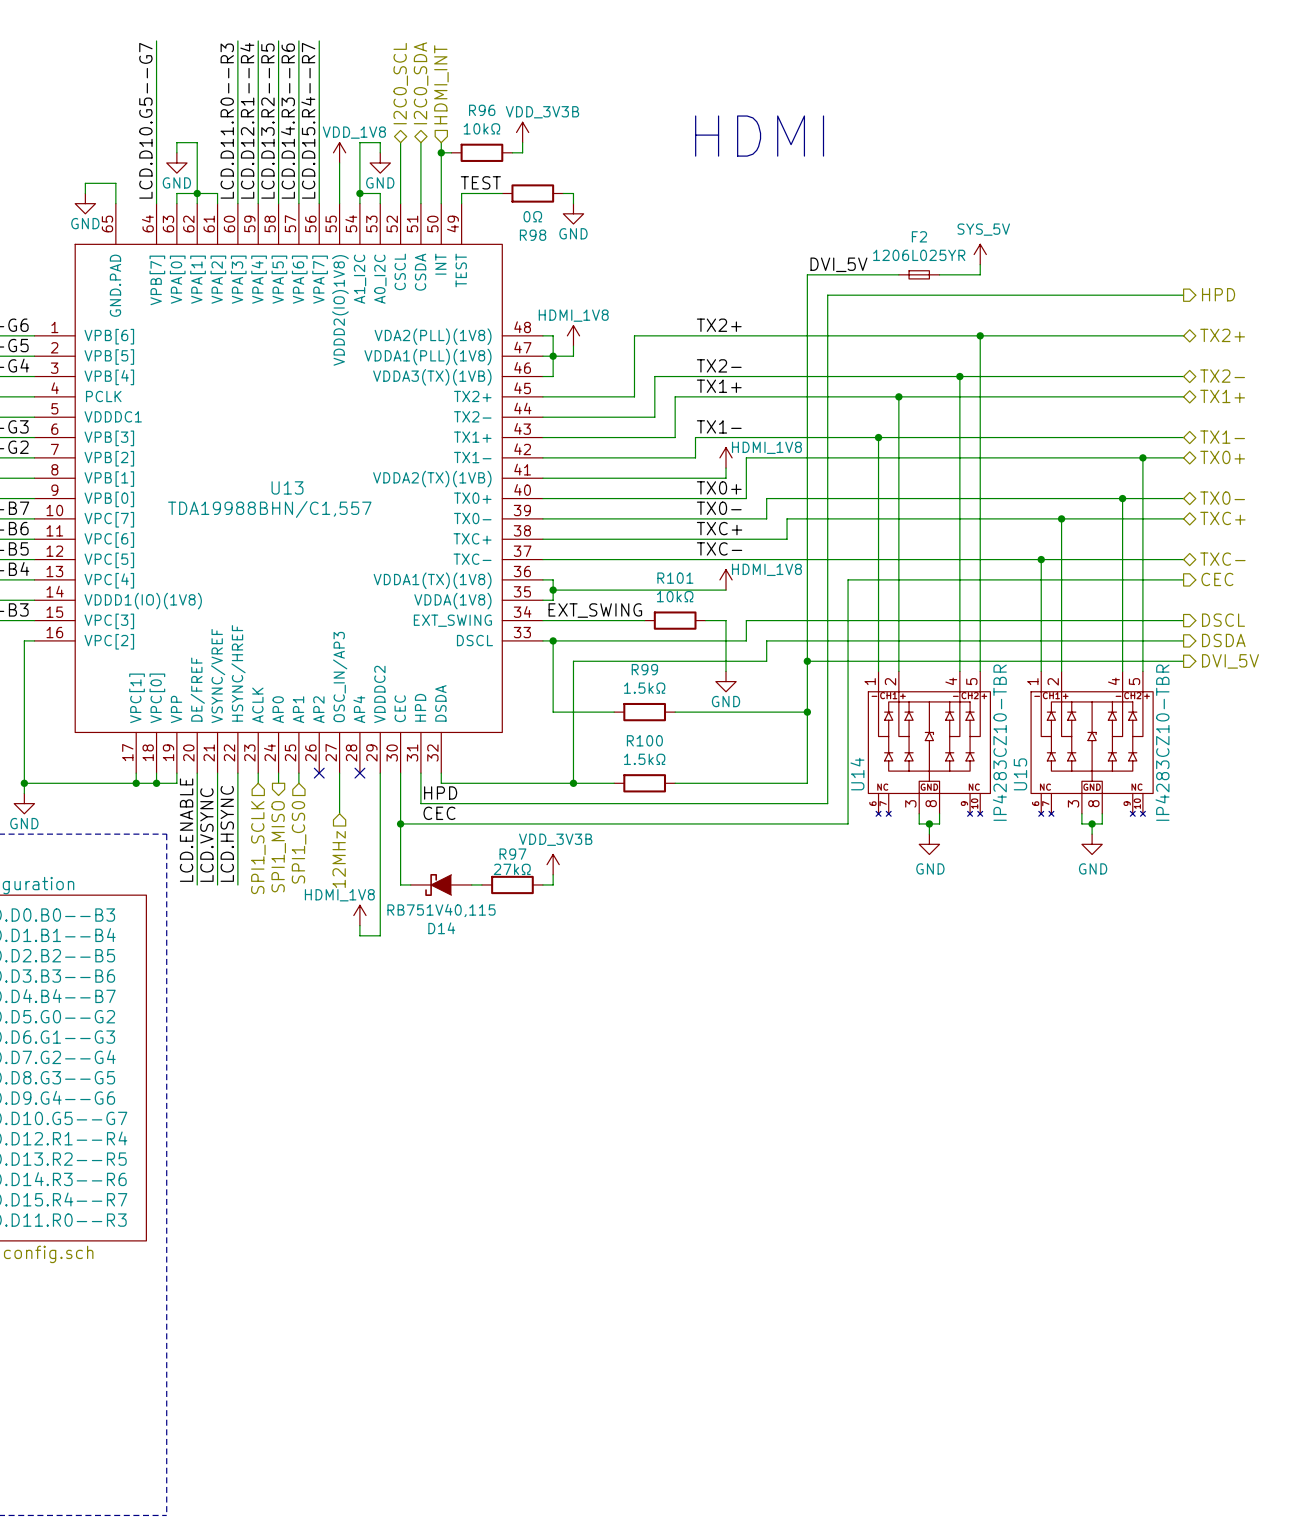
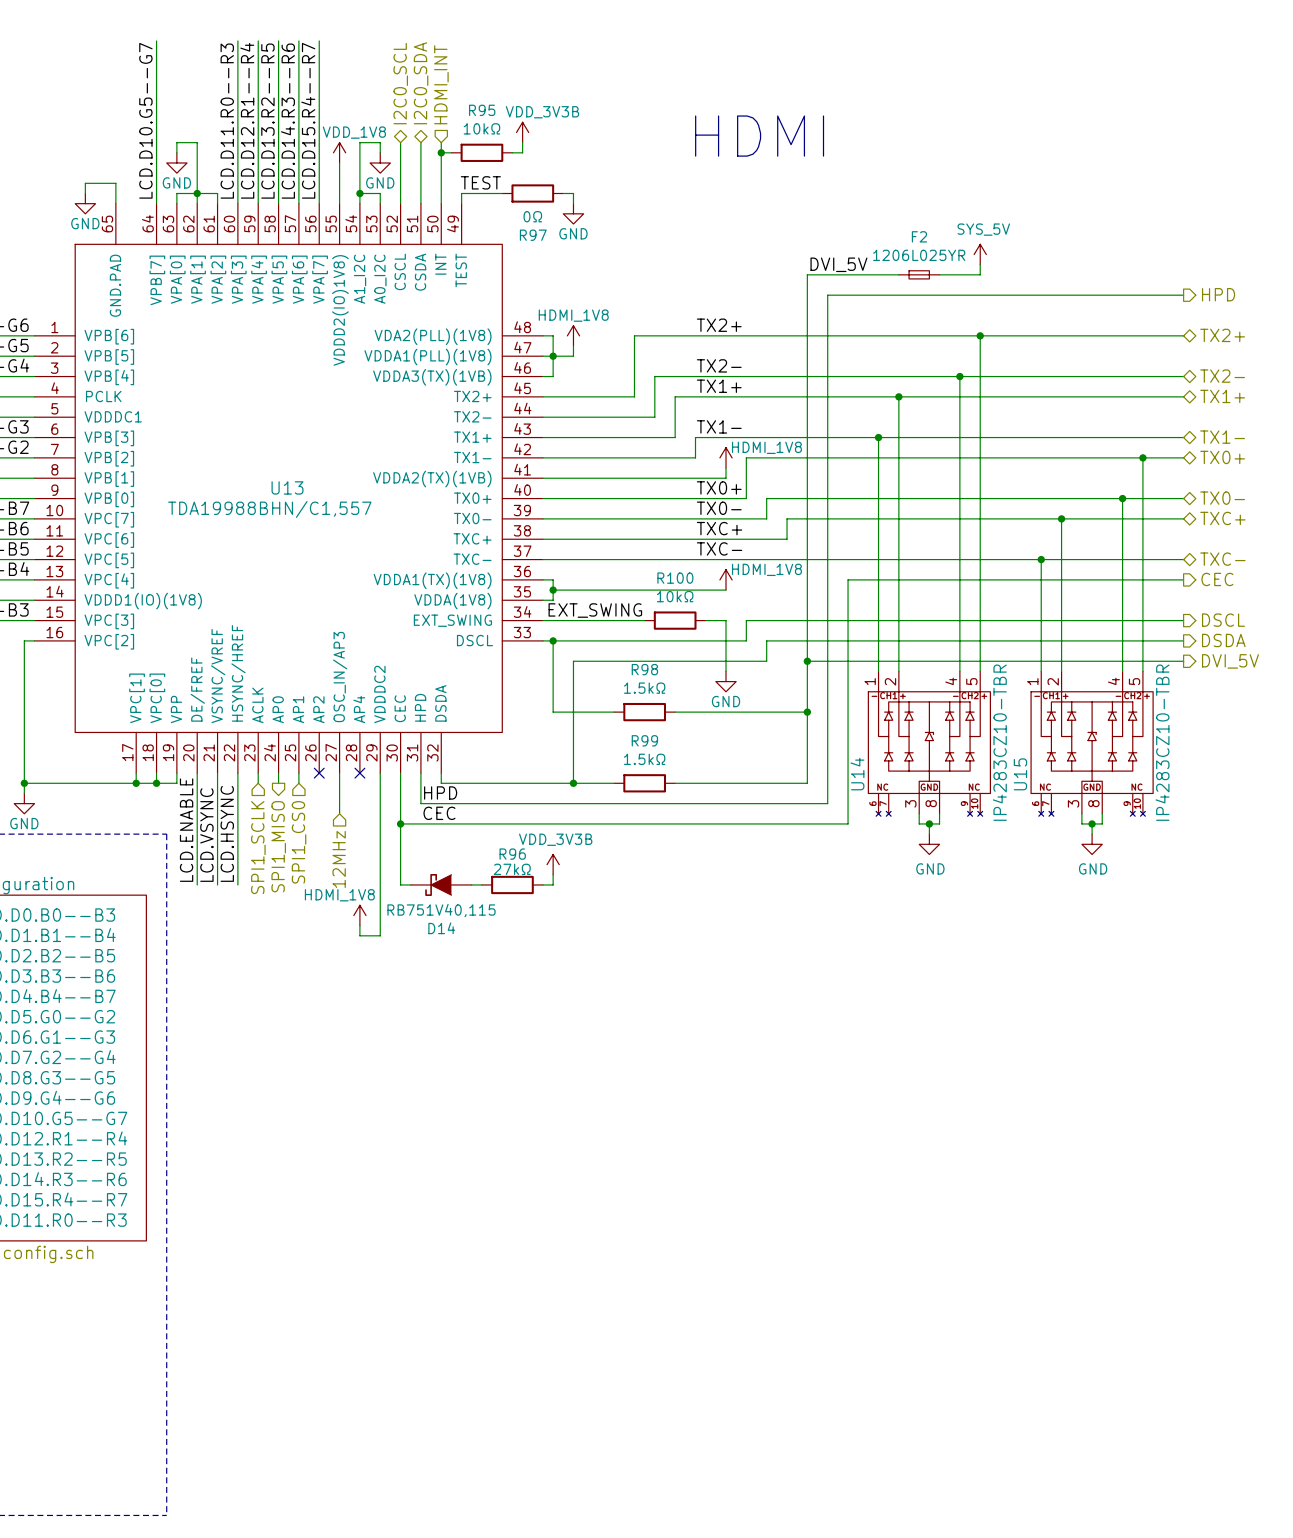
R96 name: R96 (482, 110) -> R95 (482, 110)
R98 name: R98 (533, 235) -> R97 (533, 235)
R101 name: R101 (675, 578) -> R100 (675, 578)
R99 name: R99 (644, 669) -> R98 (644, 669)
R100 name: R100 (644, 740) -> R99 (644, 740)
R97 name: R97 (512, 854) -> R96 (512, 854)

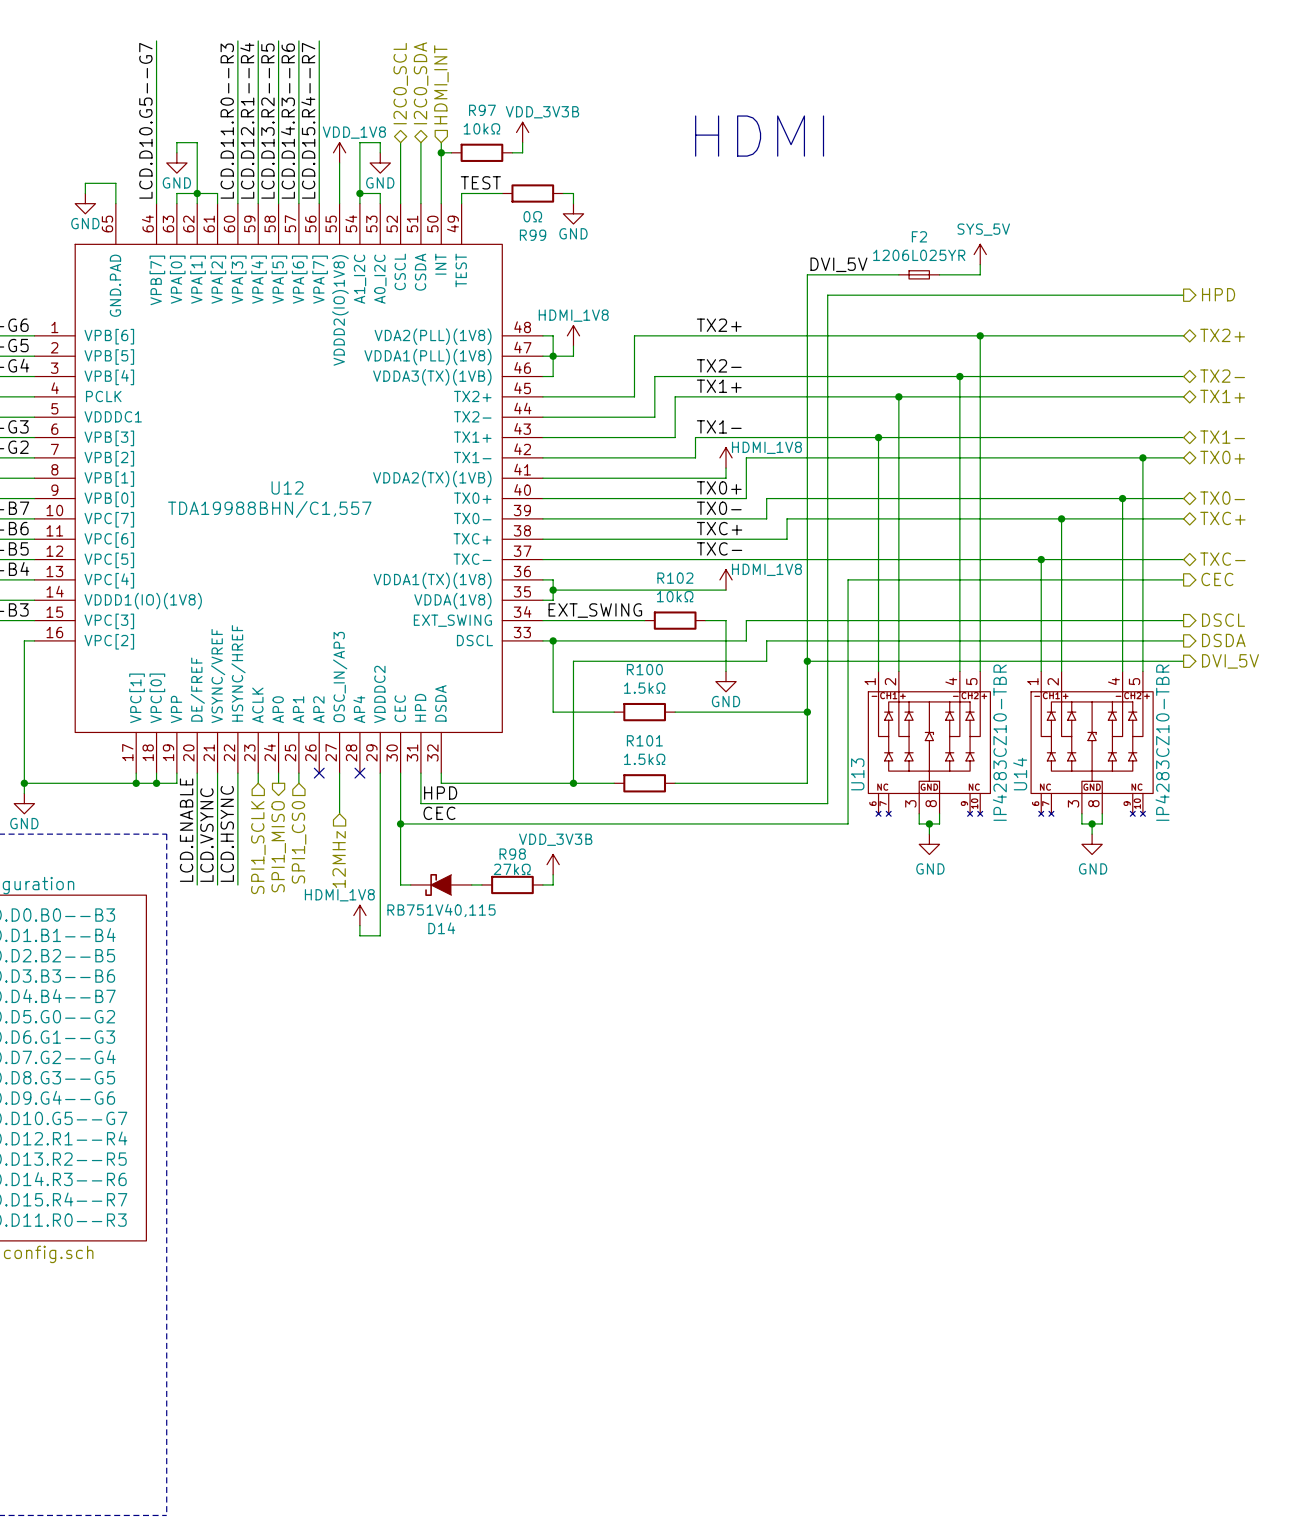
R95 name: R95 (482, 110) -> R97 (482, 110)
R97 name: R97 (533, 235) -> R99 (533, 235)
U13 name: U13 (287, 487) -> U12 (287, 487)
R100 name: R100 (675, 578) -> R102 (675, 578)
R98 name: R98 (644, 669) -> R100 (644, 669)
R99 name: R99 (644, 740) -> R101 (644, 740)
U14 name: U14 (857, 774) -> U13 (857, 774)
U15 name: U15 (1020, 774) -> U14 (1020, 774)
R96 name: R96 (512, 854) -> R98 (512, 854)

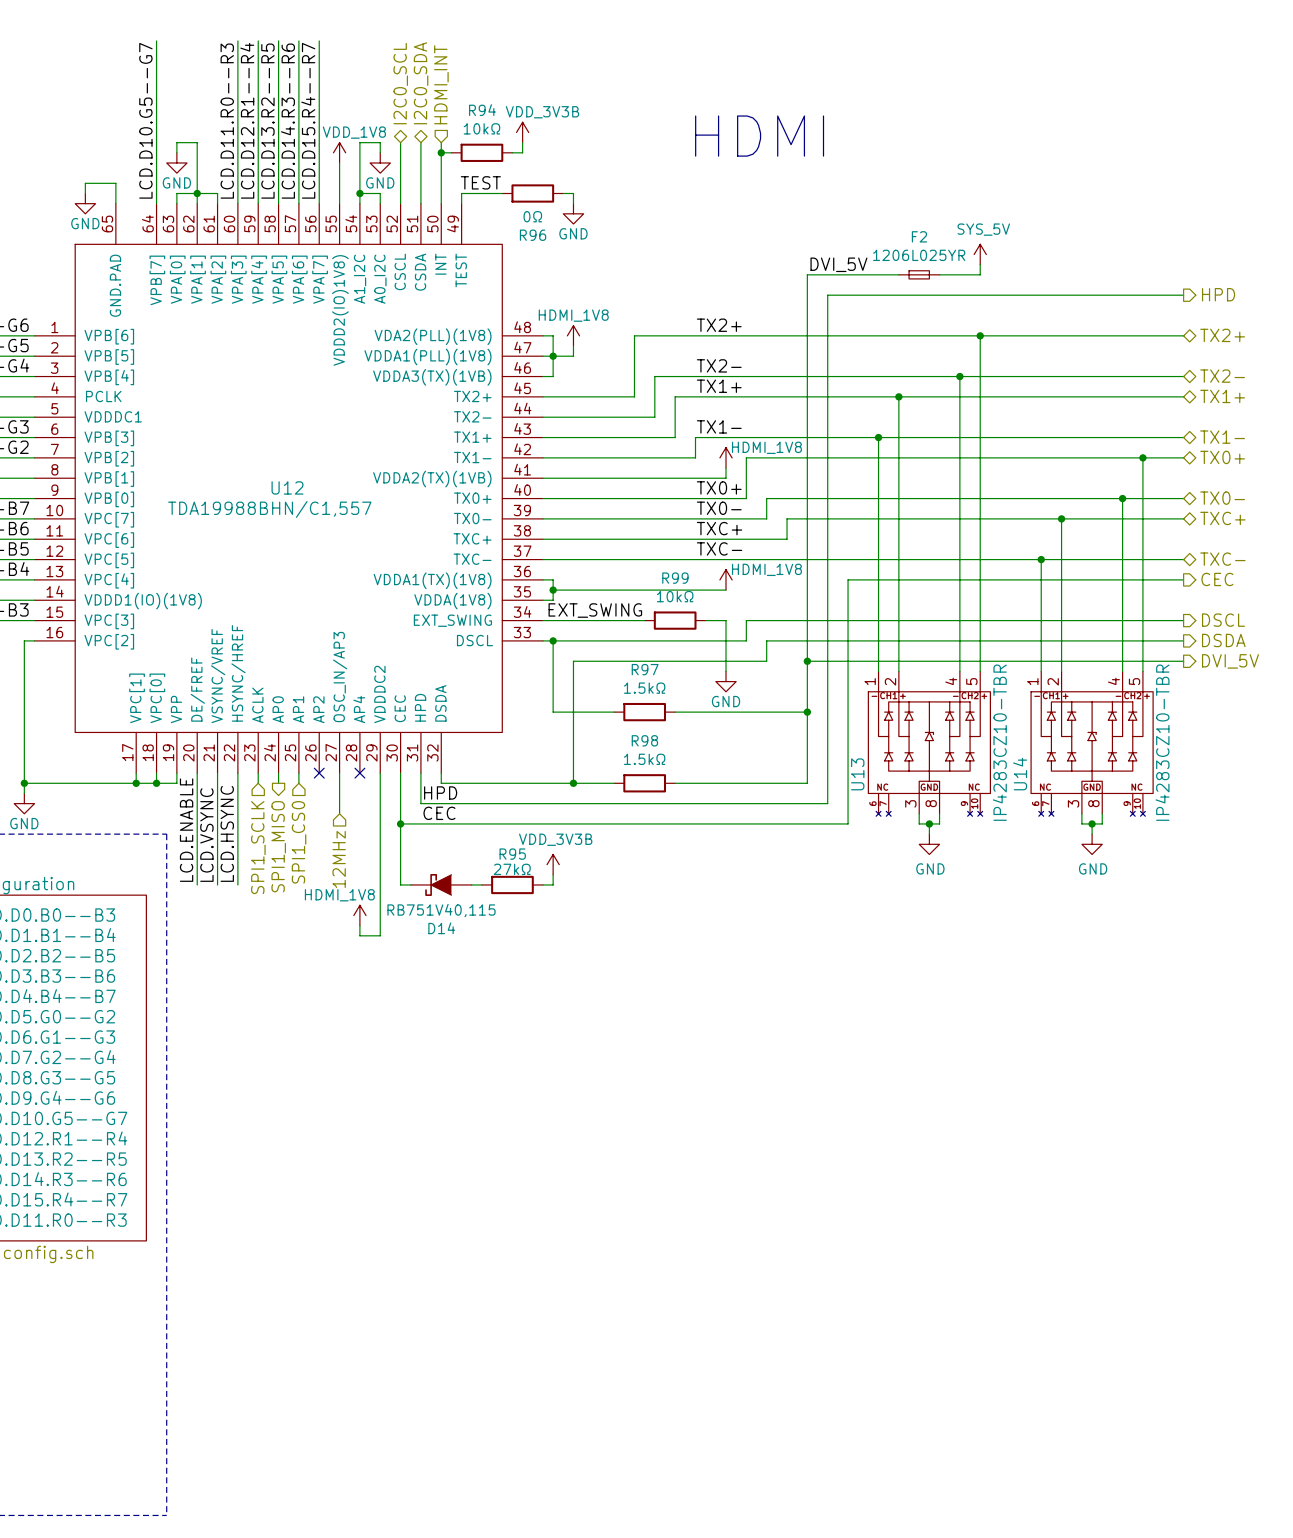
R97 name: R97 (482, 110) -> R94 (482, 110)
R99 name: R99 (533, 235) -> R96 (533, 235)
R102 name: R102 (675, 578) -> R99 (675, 578)
R100 name: R100 (644, 669) -> R97 (645, 669)
R101 name: R101 (644, 740) -> R98 (644, 740)
R98 name: R98 (512, 854) -> R95 (512, 854)

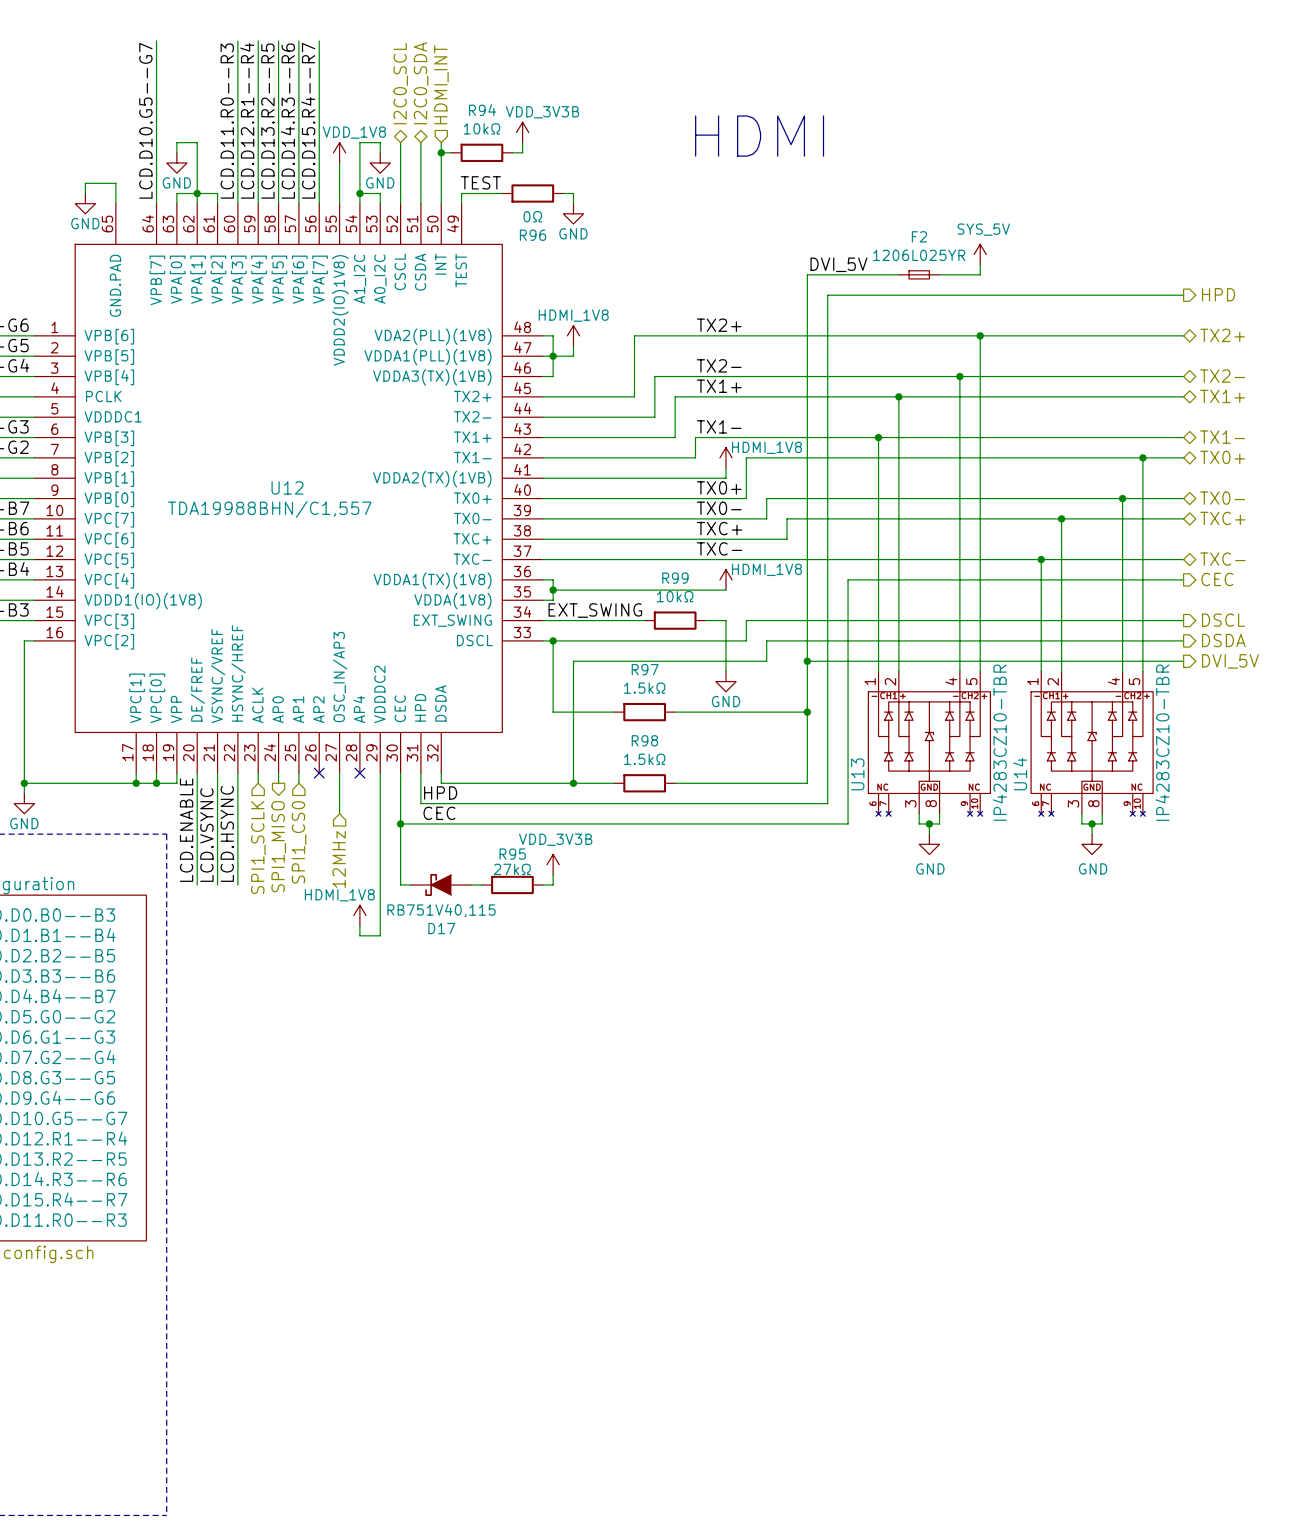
D14 name: D14 (441, 928) -> D17 (441, 928)

